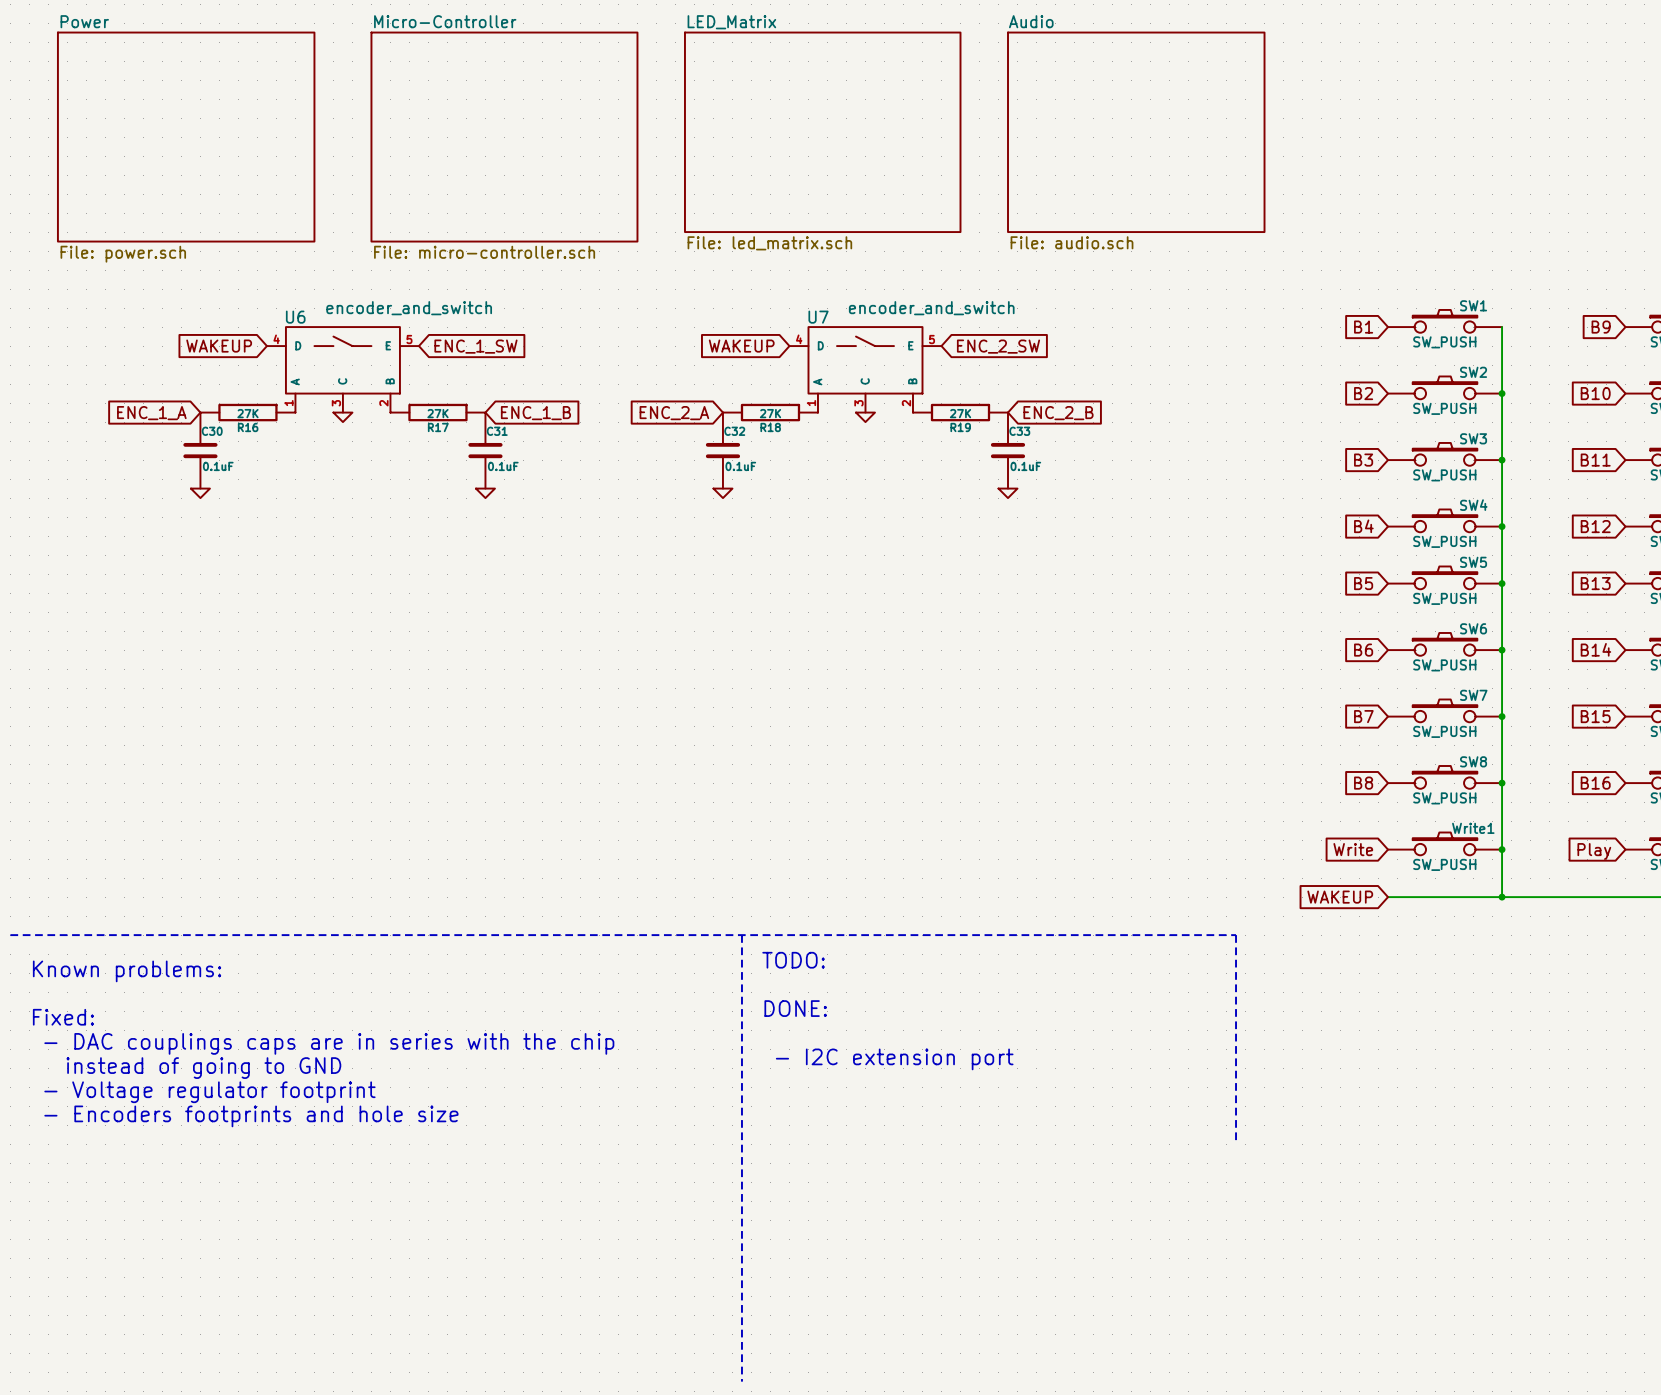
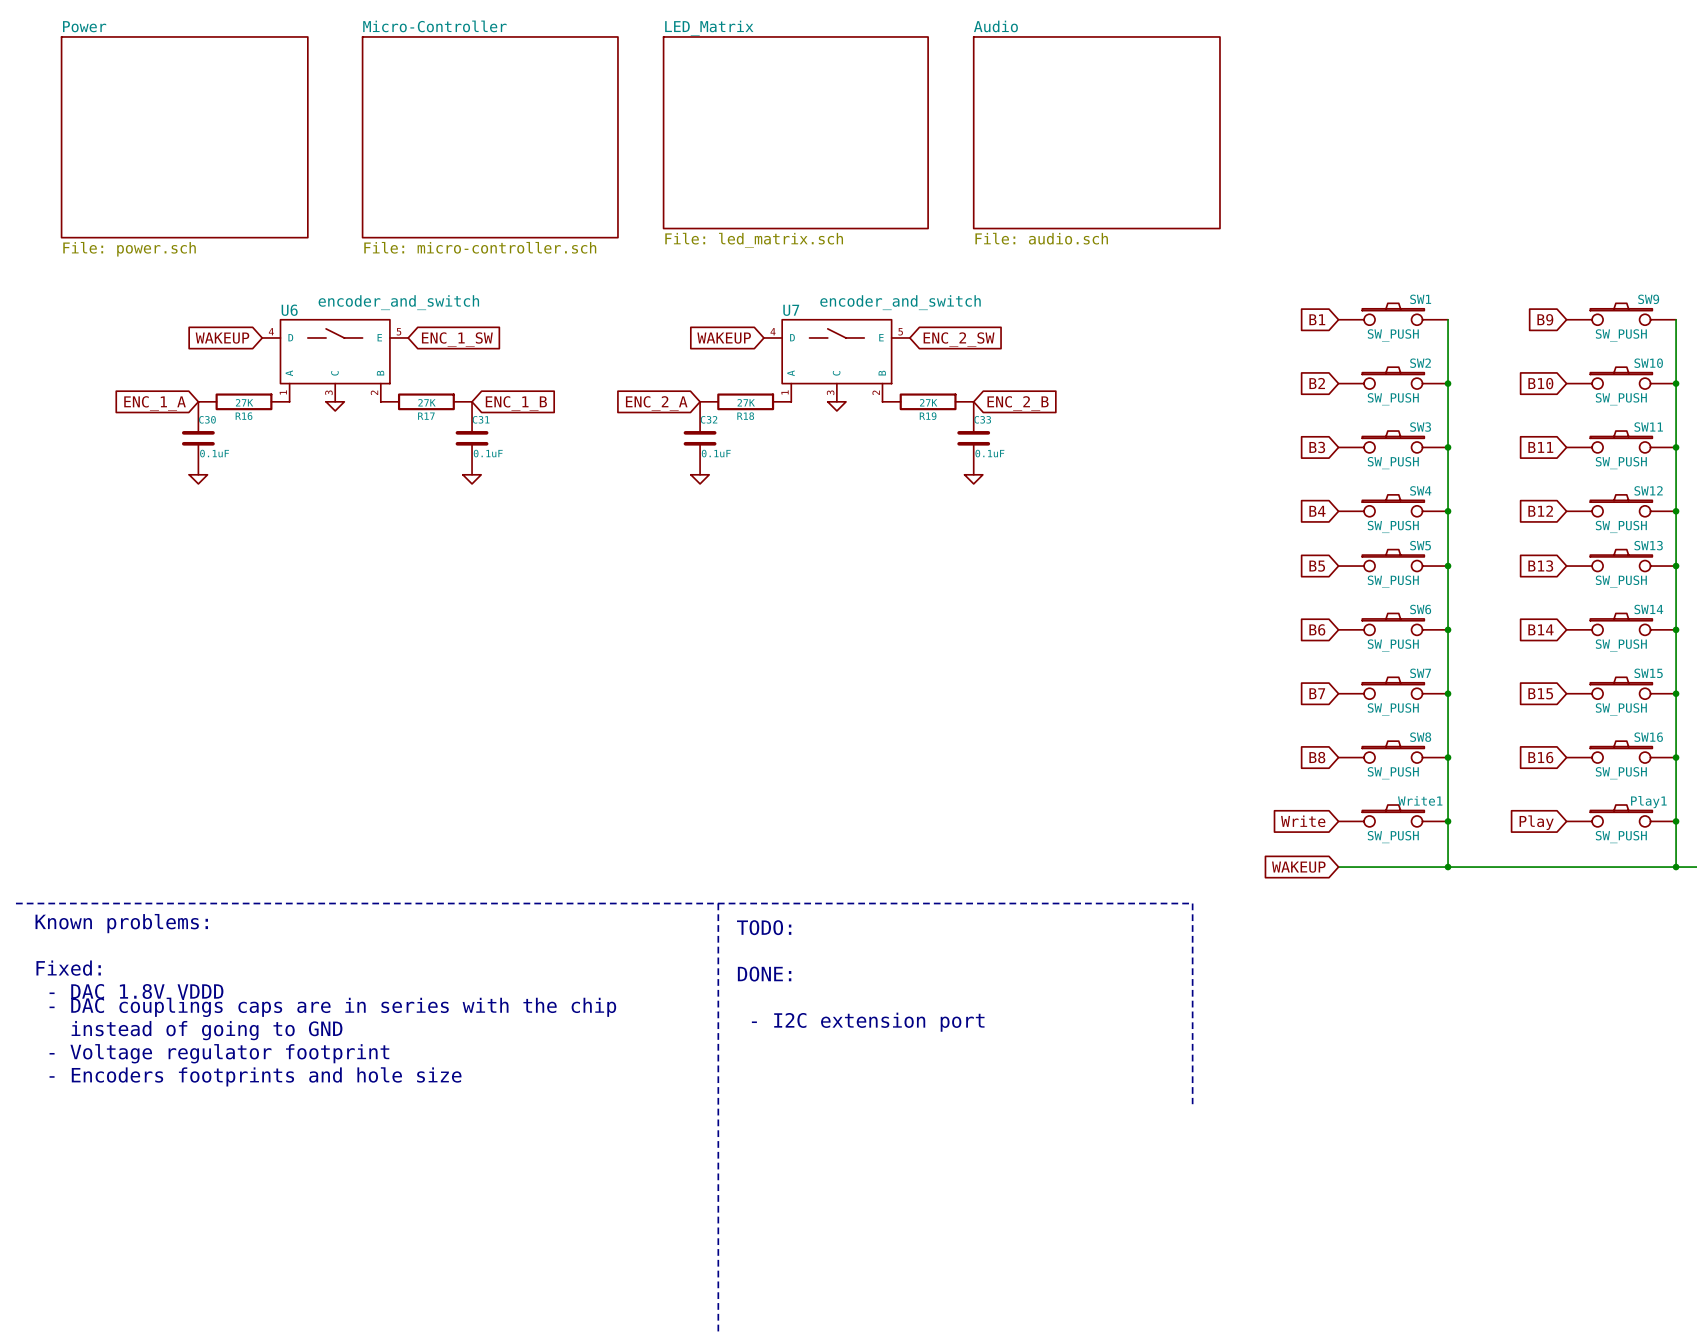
text position: Known problems: (127, 971) -> Known problems: (121, 923)
text position: Fixed: (63, 1017) -> Fixed: (68, 968)
text: none -> - DAC 1.8V VDDD (136, 991)

